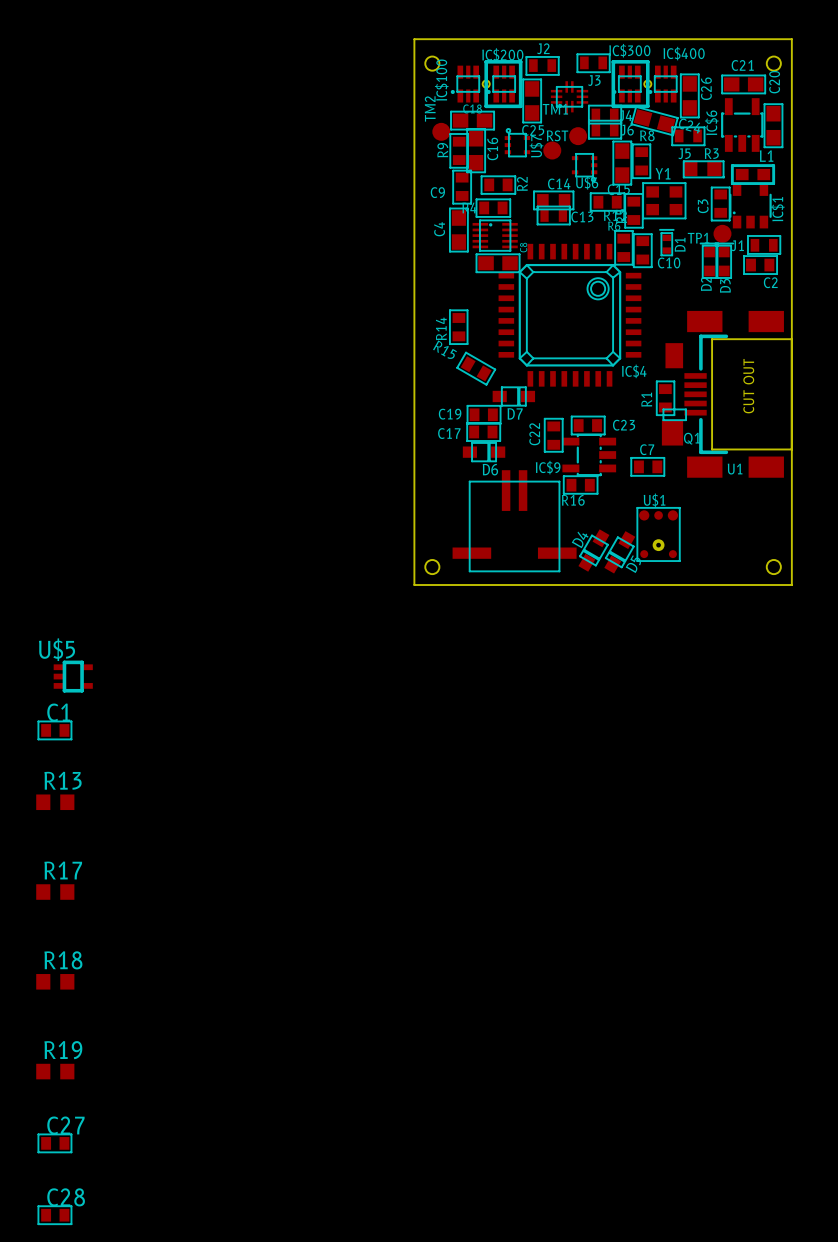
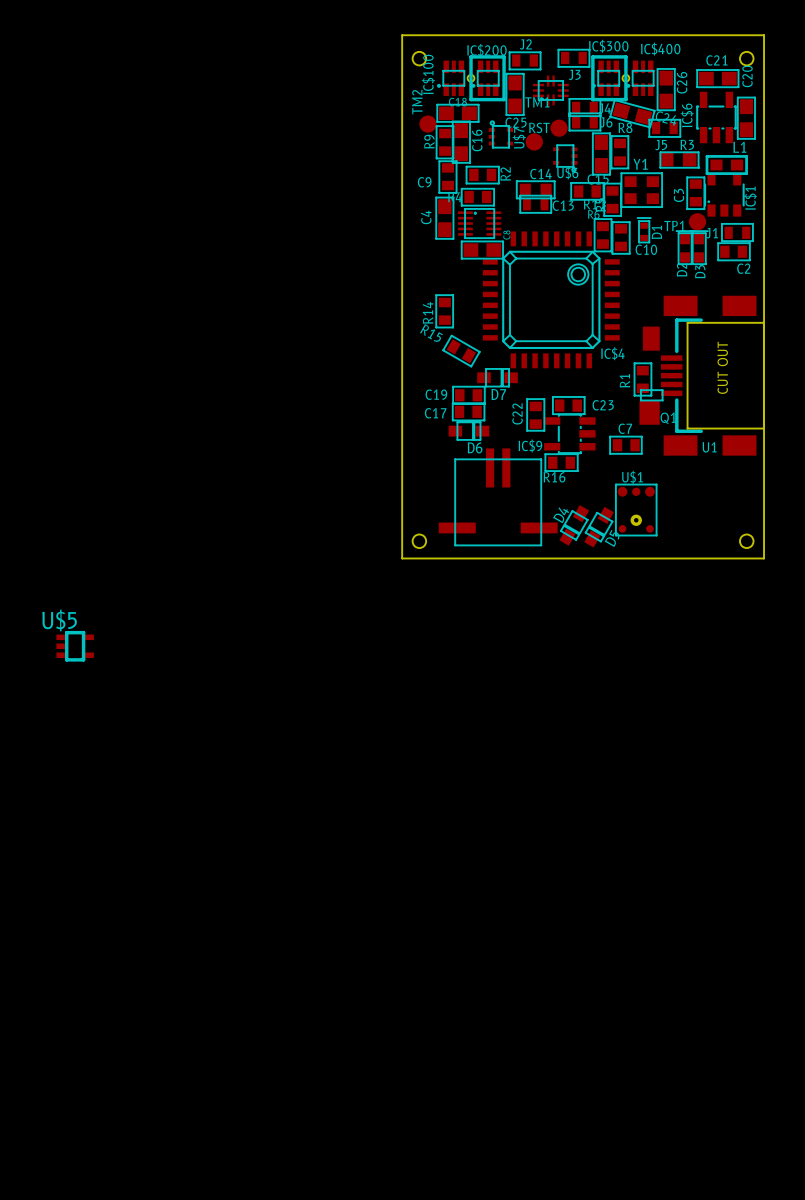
C1: (54, 730) -> none
R13: (55, 802) -> none
R17: (55, 892) -> none
R18: (55, 981) -> none
R19: (55, 1071) -> none
C27: (54, 1143) -> none
C28: (54, 1215) -> none

